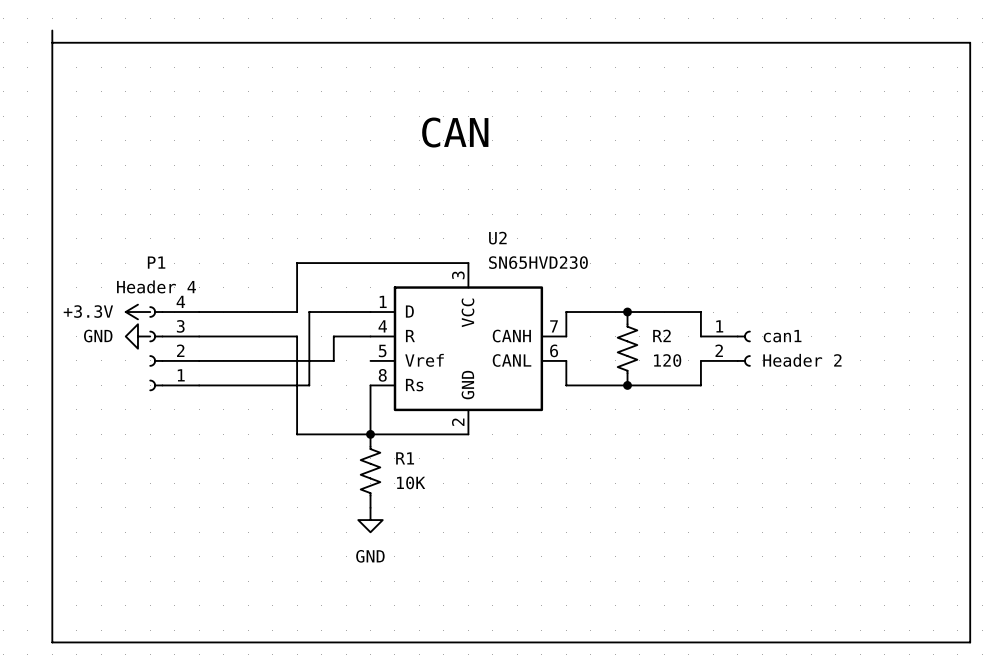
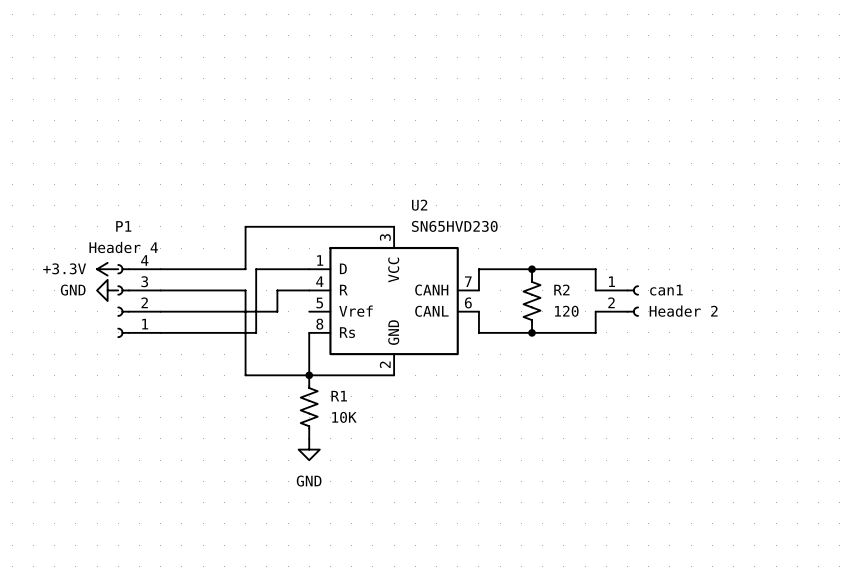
line: (52, 30) (52, 642) (970, 642) (970, 42) (52, 42) -> none
text: CAN (455, 132) -> none

